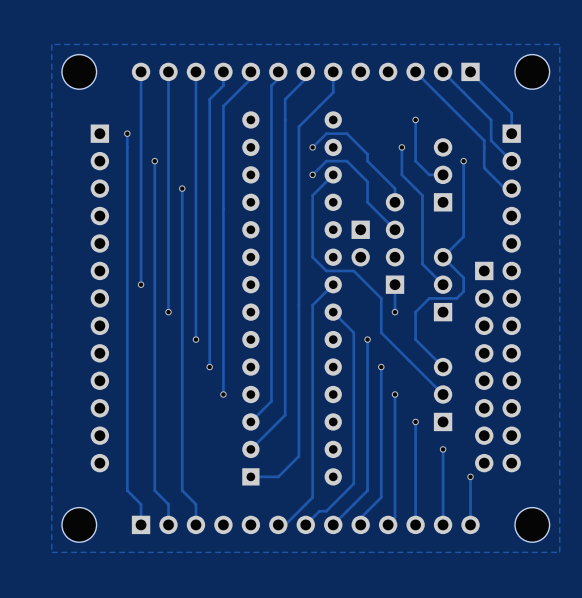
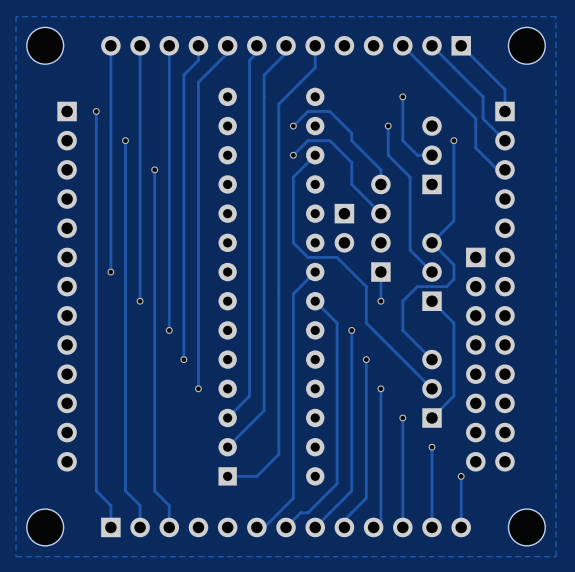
track: none -> (432, 301) (453, 323) (453, 396) (432, 417)

